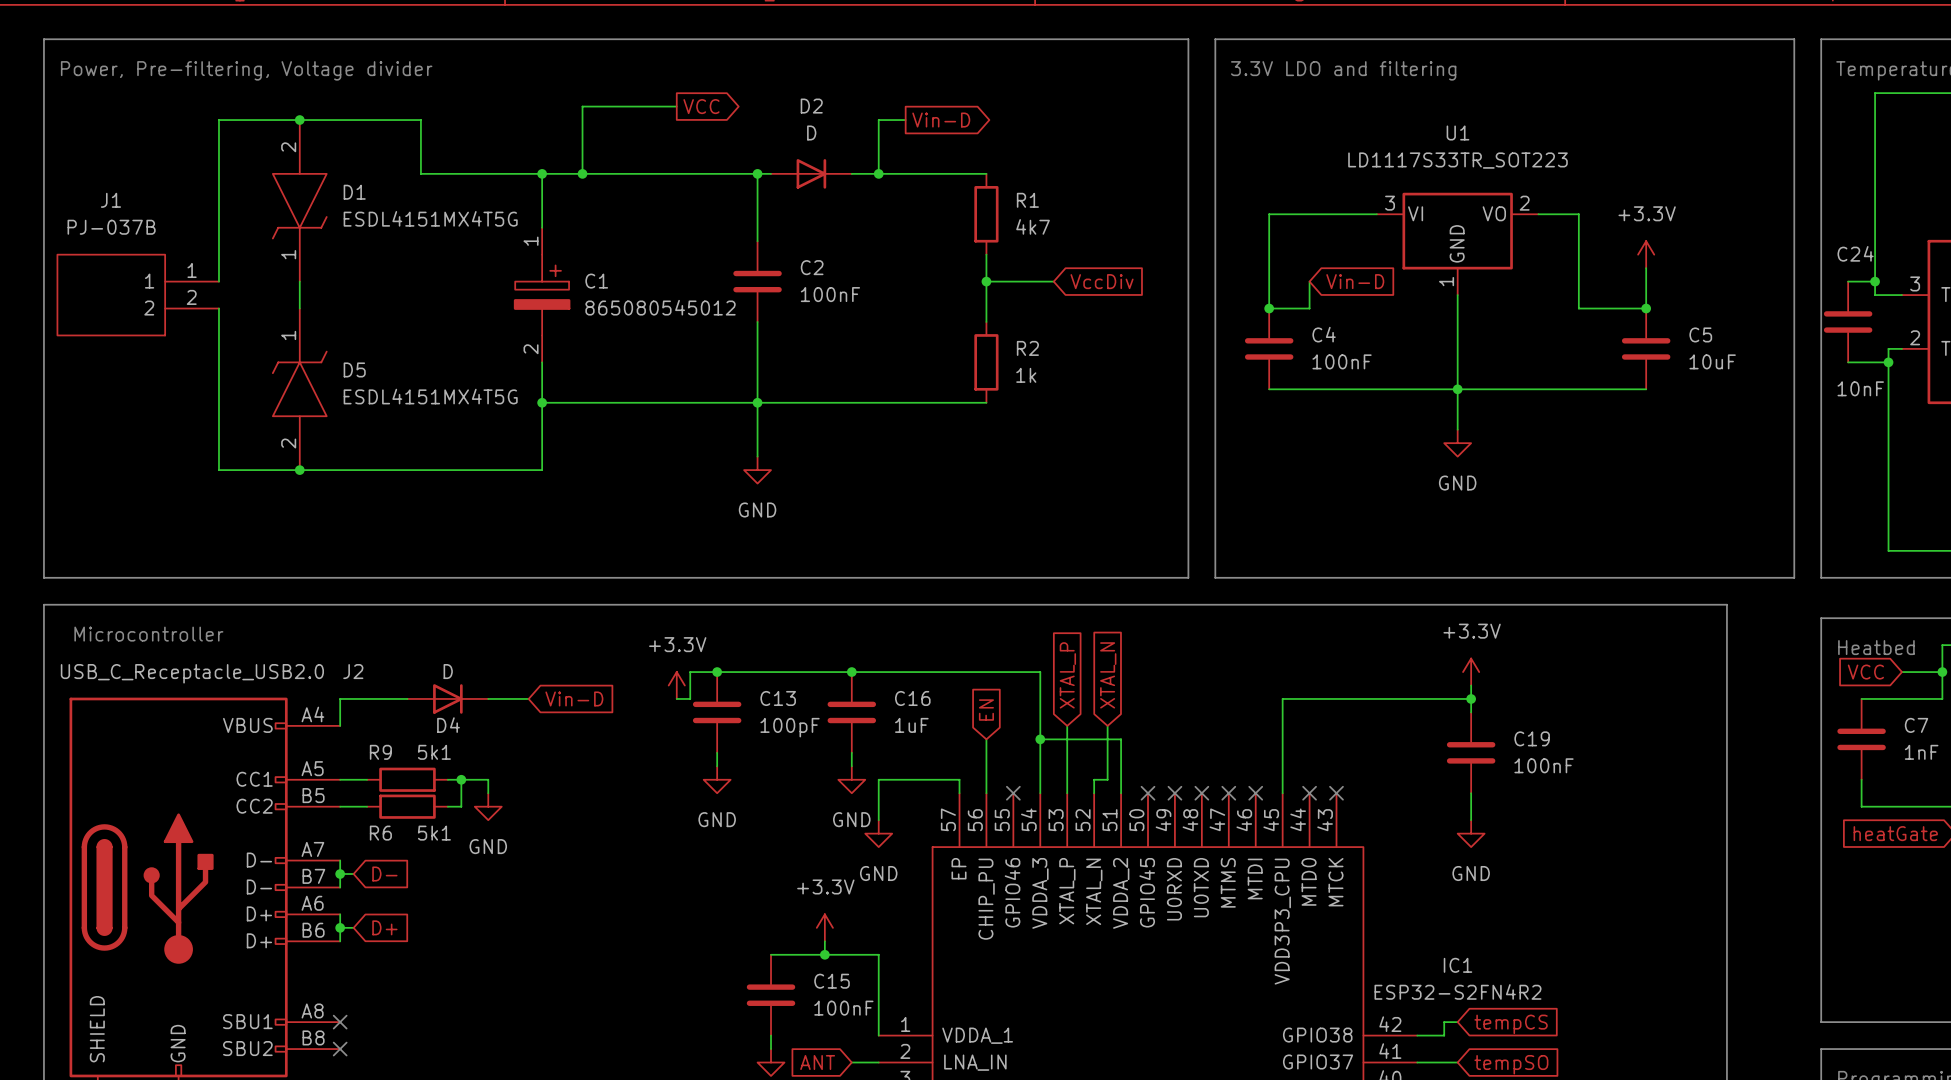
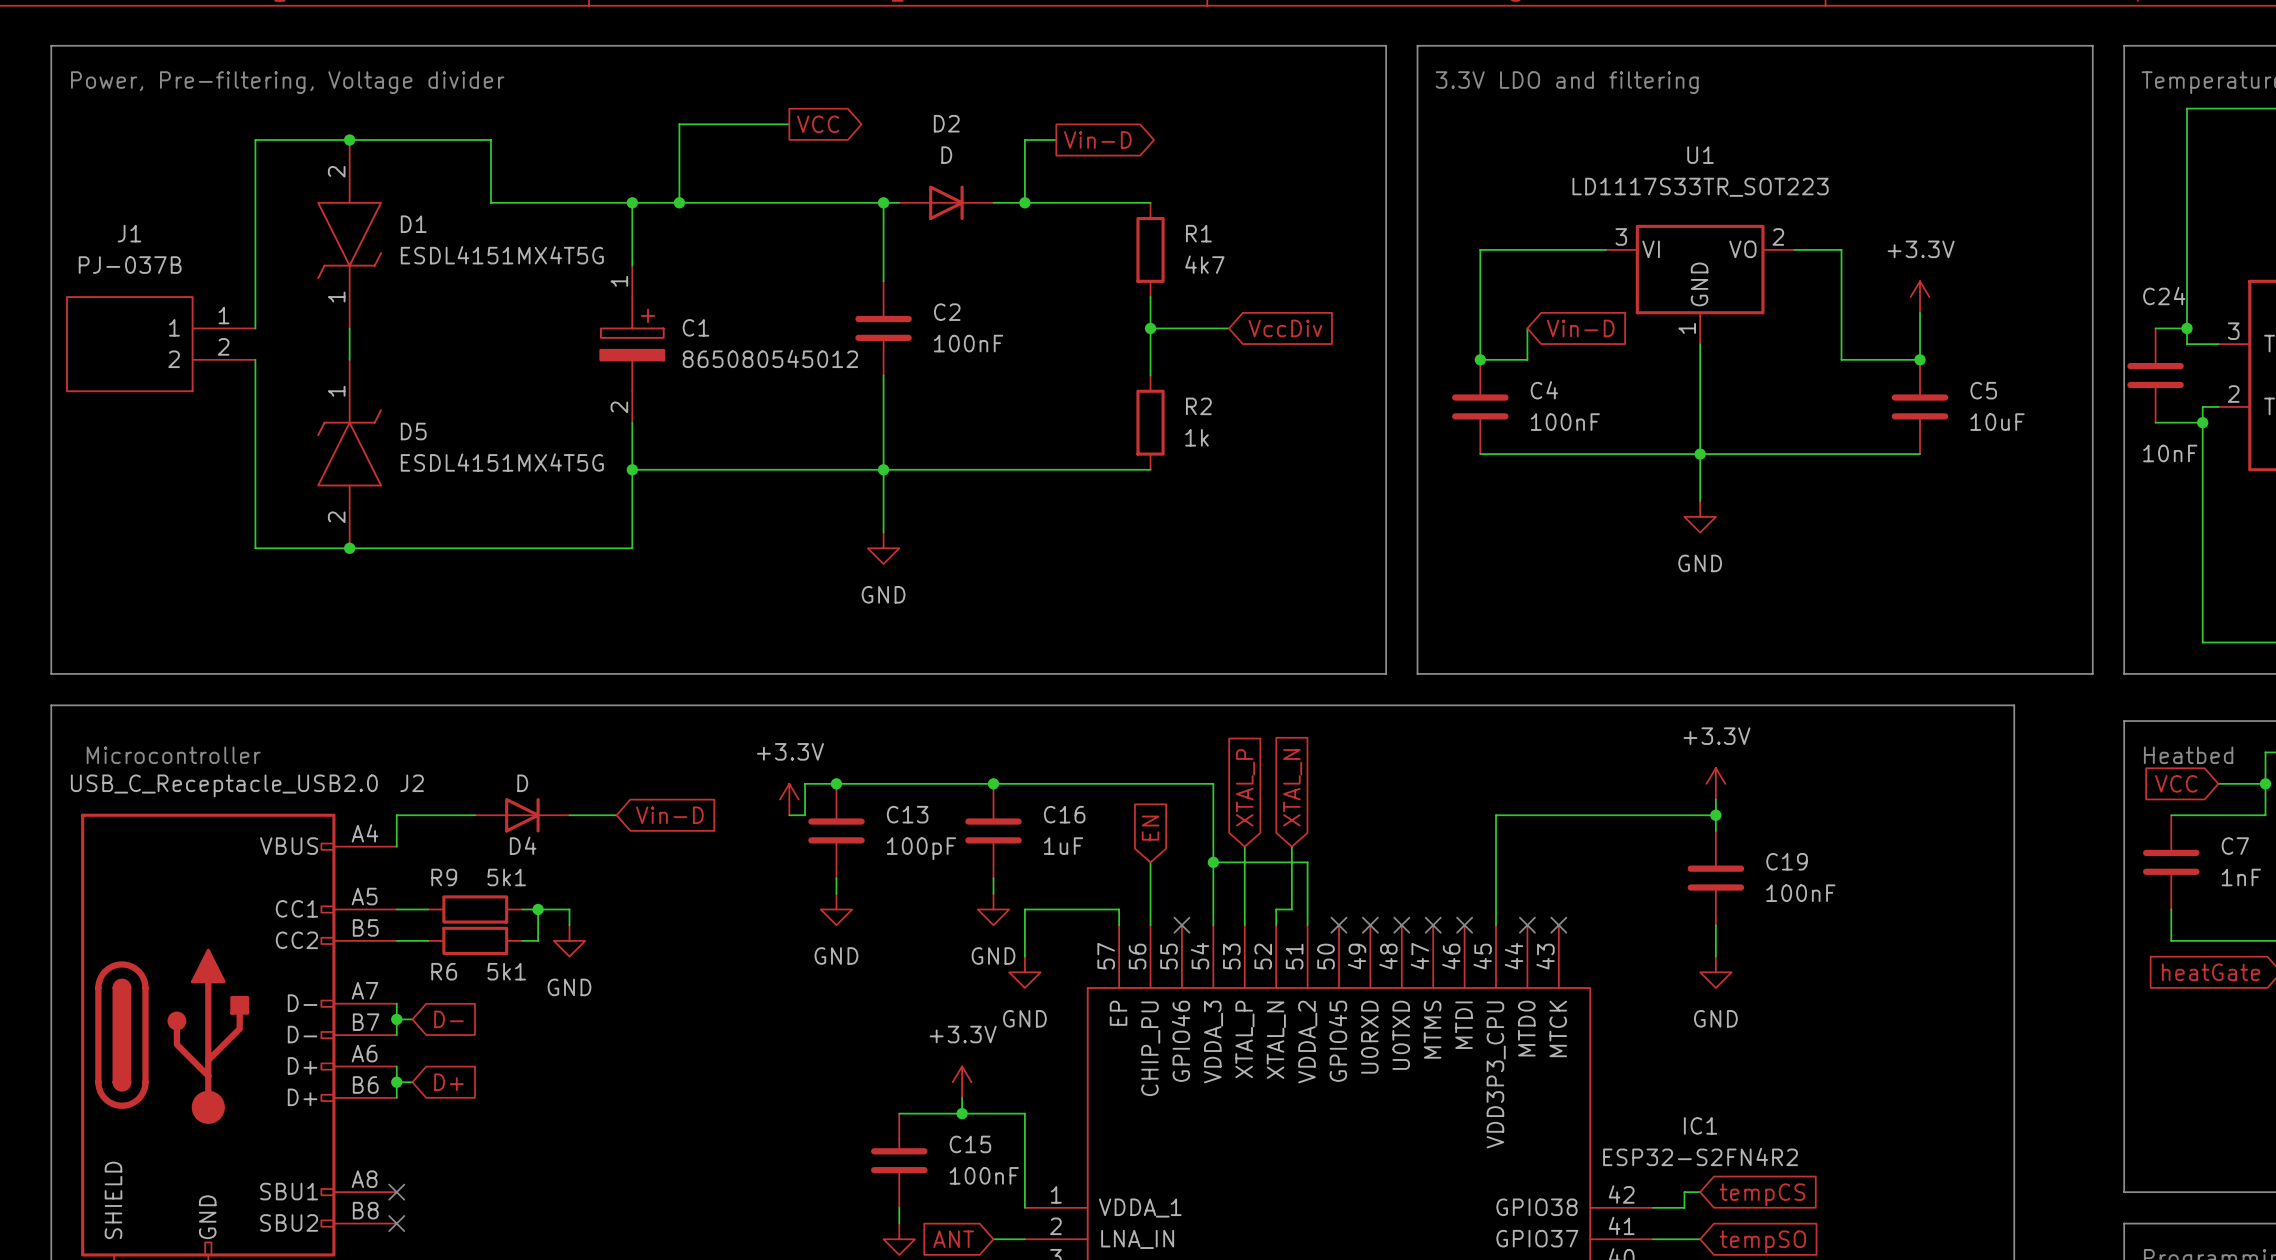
text position: Microcontroller (148, 634) -> Microcontroller (173, 755)

